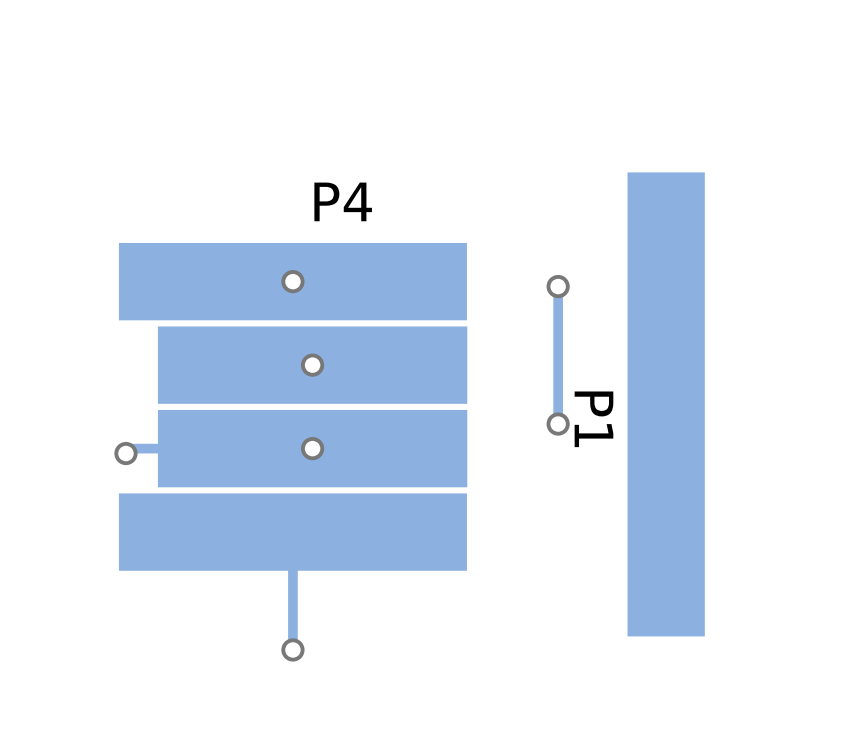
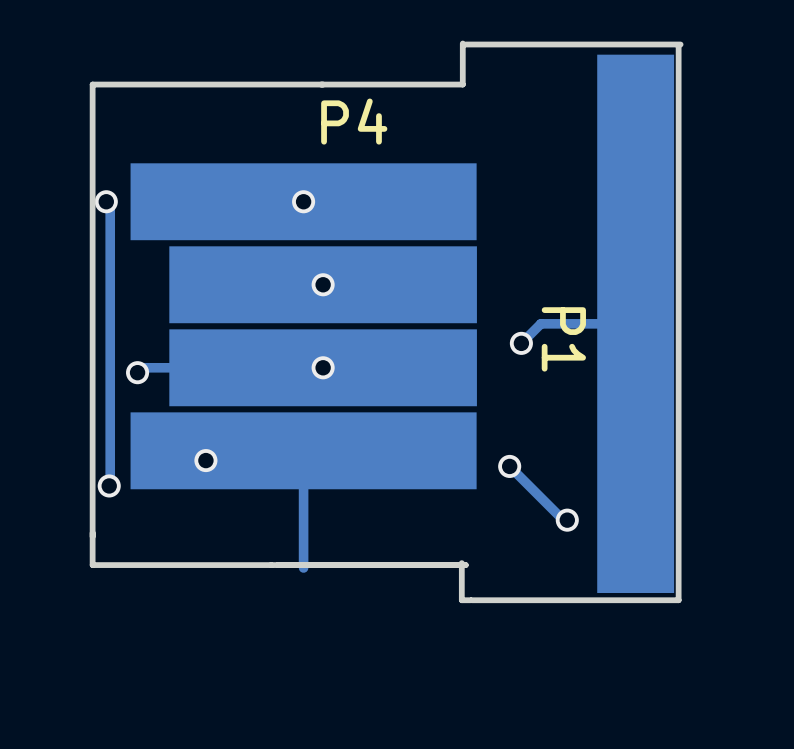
board edge: none -> (462, 43) (462, 84) (92, 84) (92, 565) (465, 565)
board edge: none -> (680, 44) (465, 44)
board edge: none -> (678, 45) (678, 600) (471, 600)
P1 footprint: [627, 172, 705, 637] -> [597, 54, 675, 594]
track: none -> (106, 201) (110, 205) (109, 485)
via: none -> (106, 201)
track: (558, 286) (558, 424) -> none
via: (558, 286) -> none
track: none -> (635, 323) (540, 323) (521, 343)
via position: (558, 424) -> (521, 343)
via: none -> (205, 460)
track: none -> (509, 466) (563, 520) (567, 520)
via: none -> (509, 466)
via: none -> (109, 485)
via: none -> (567, 520)
board edge: none -> (461, 563) (461, 600) (470, 600)
via: (292, 649) -> none

